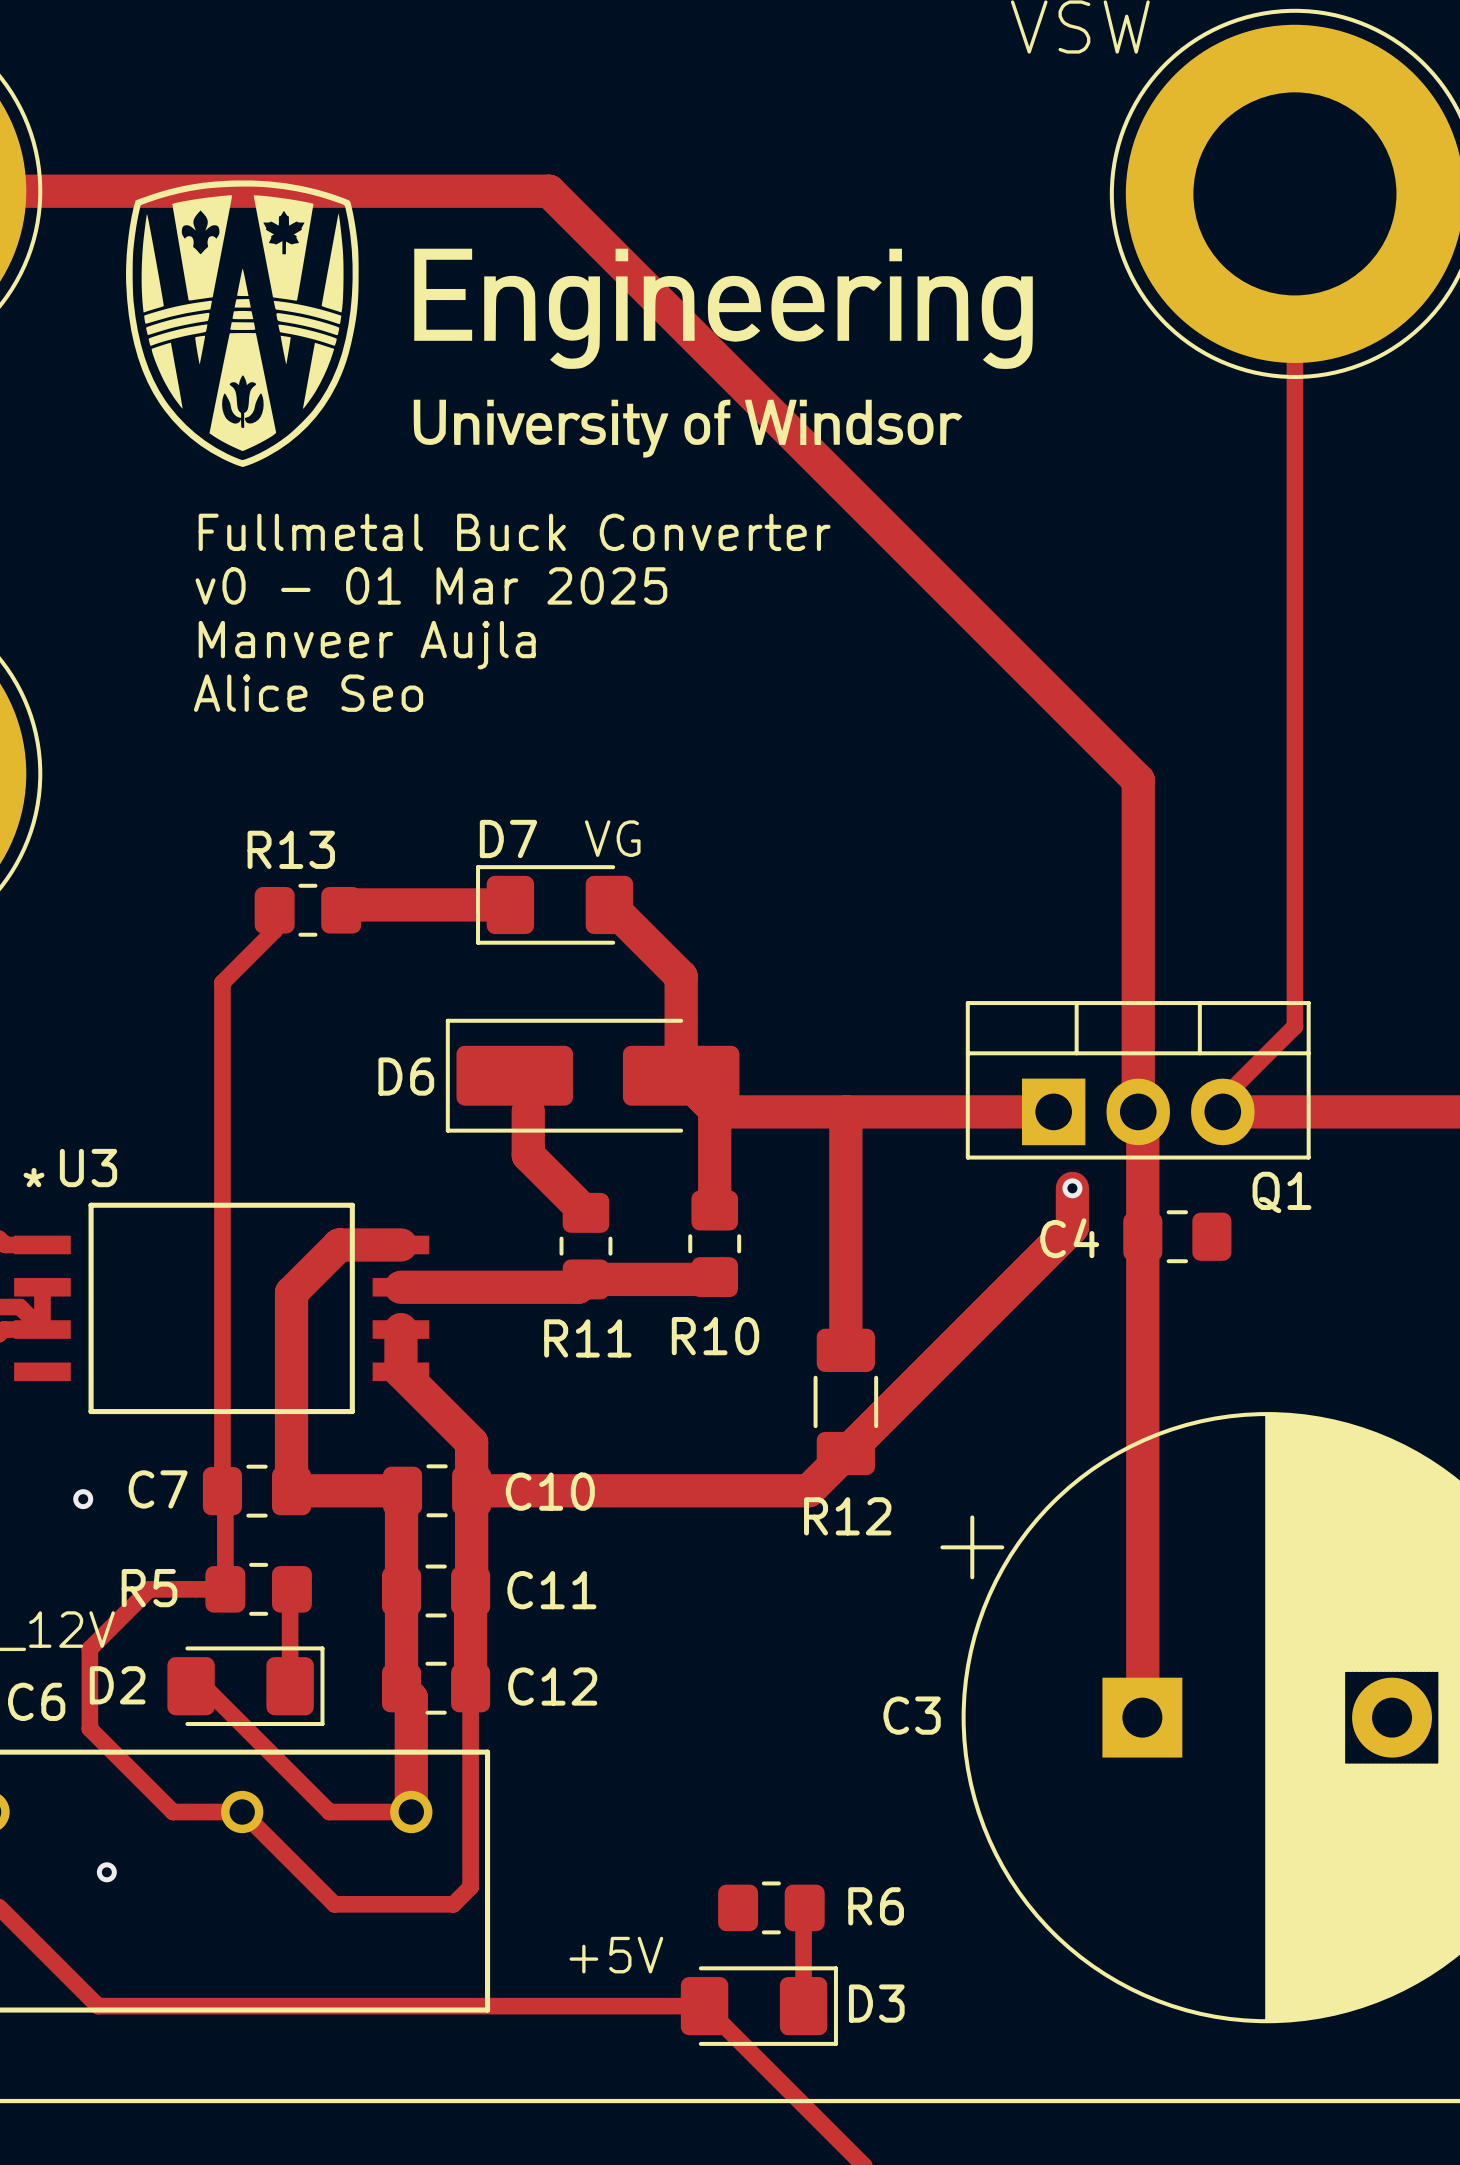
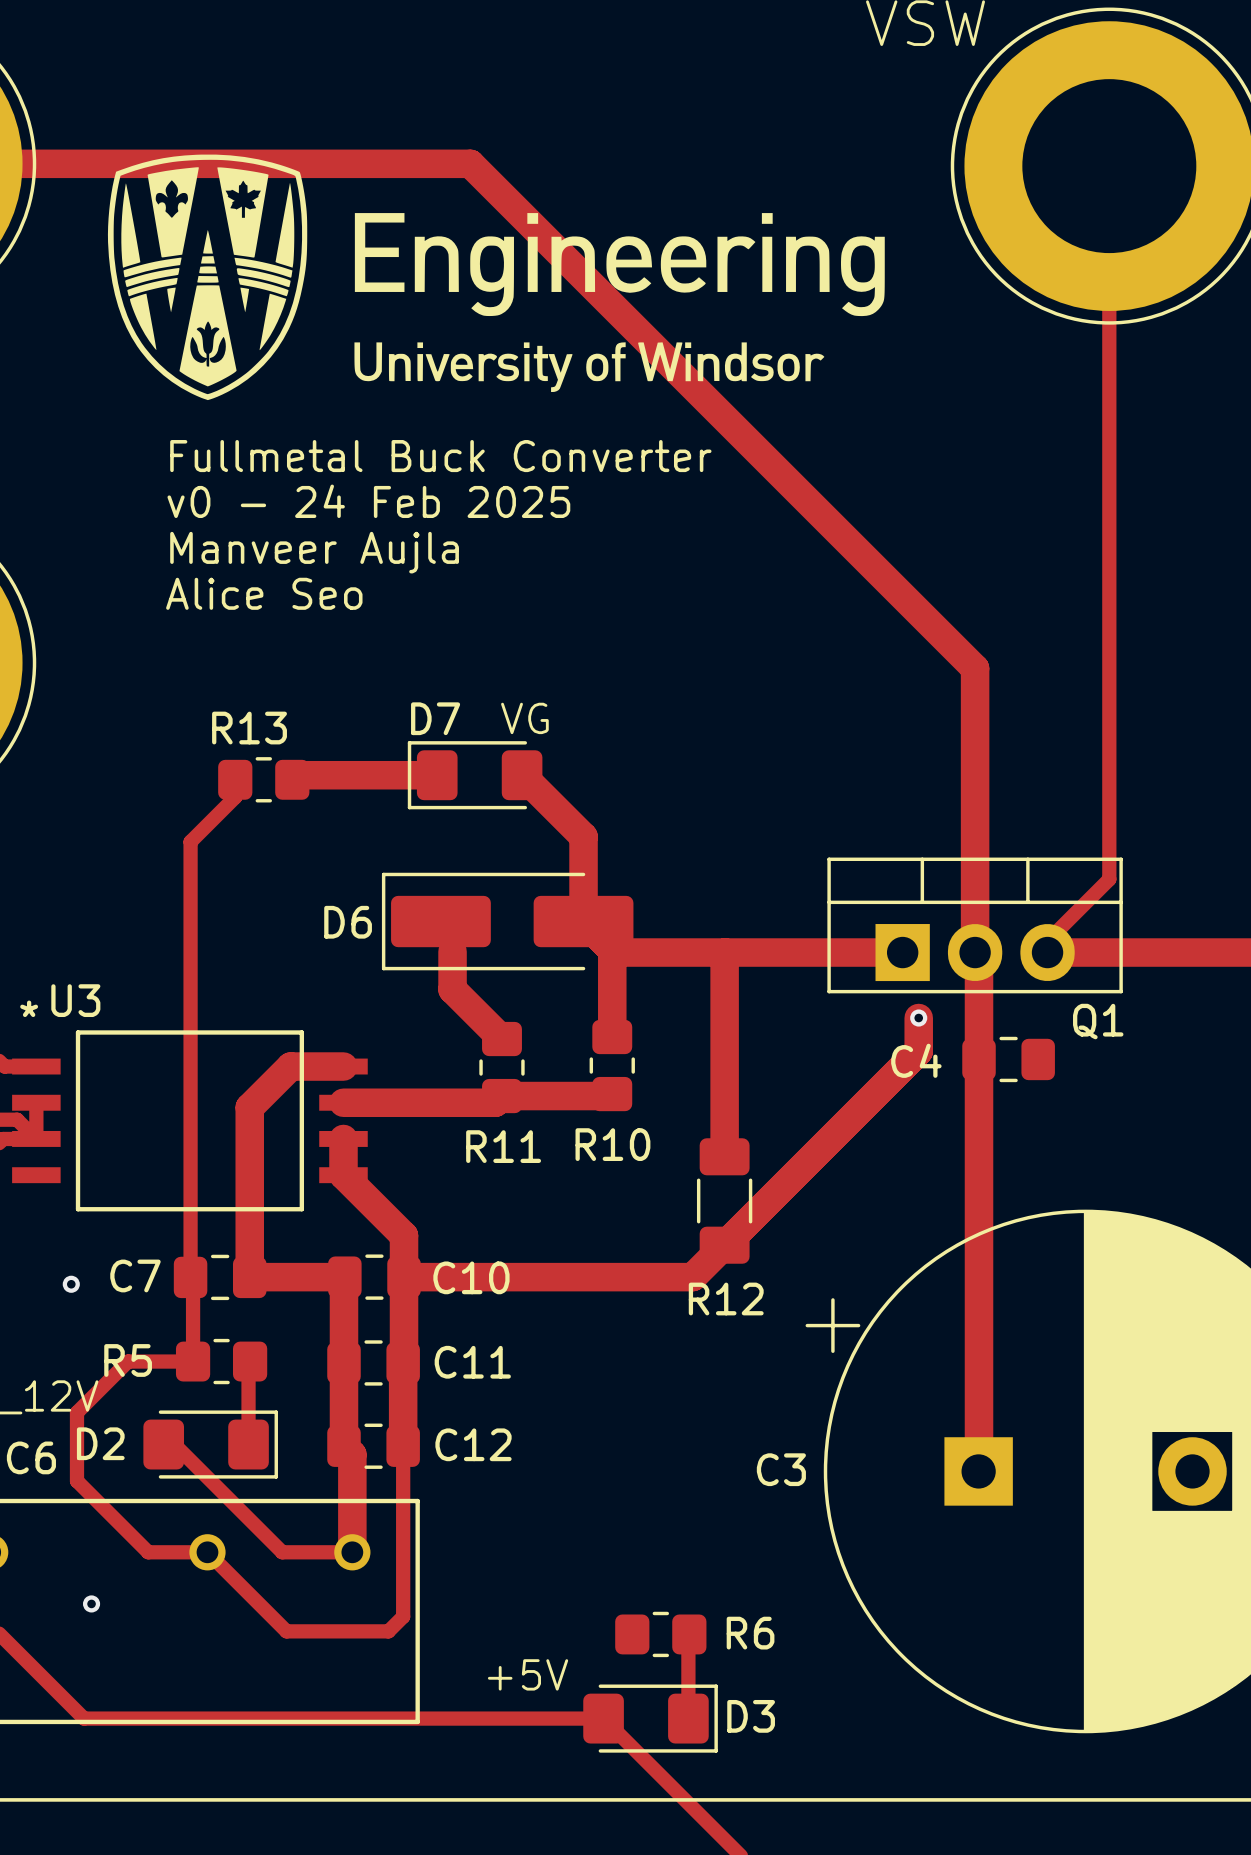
text: v0 - 01 Mar 2025 (431, 585) -> v0 - 24 Feb 2025 (368, 501)

